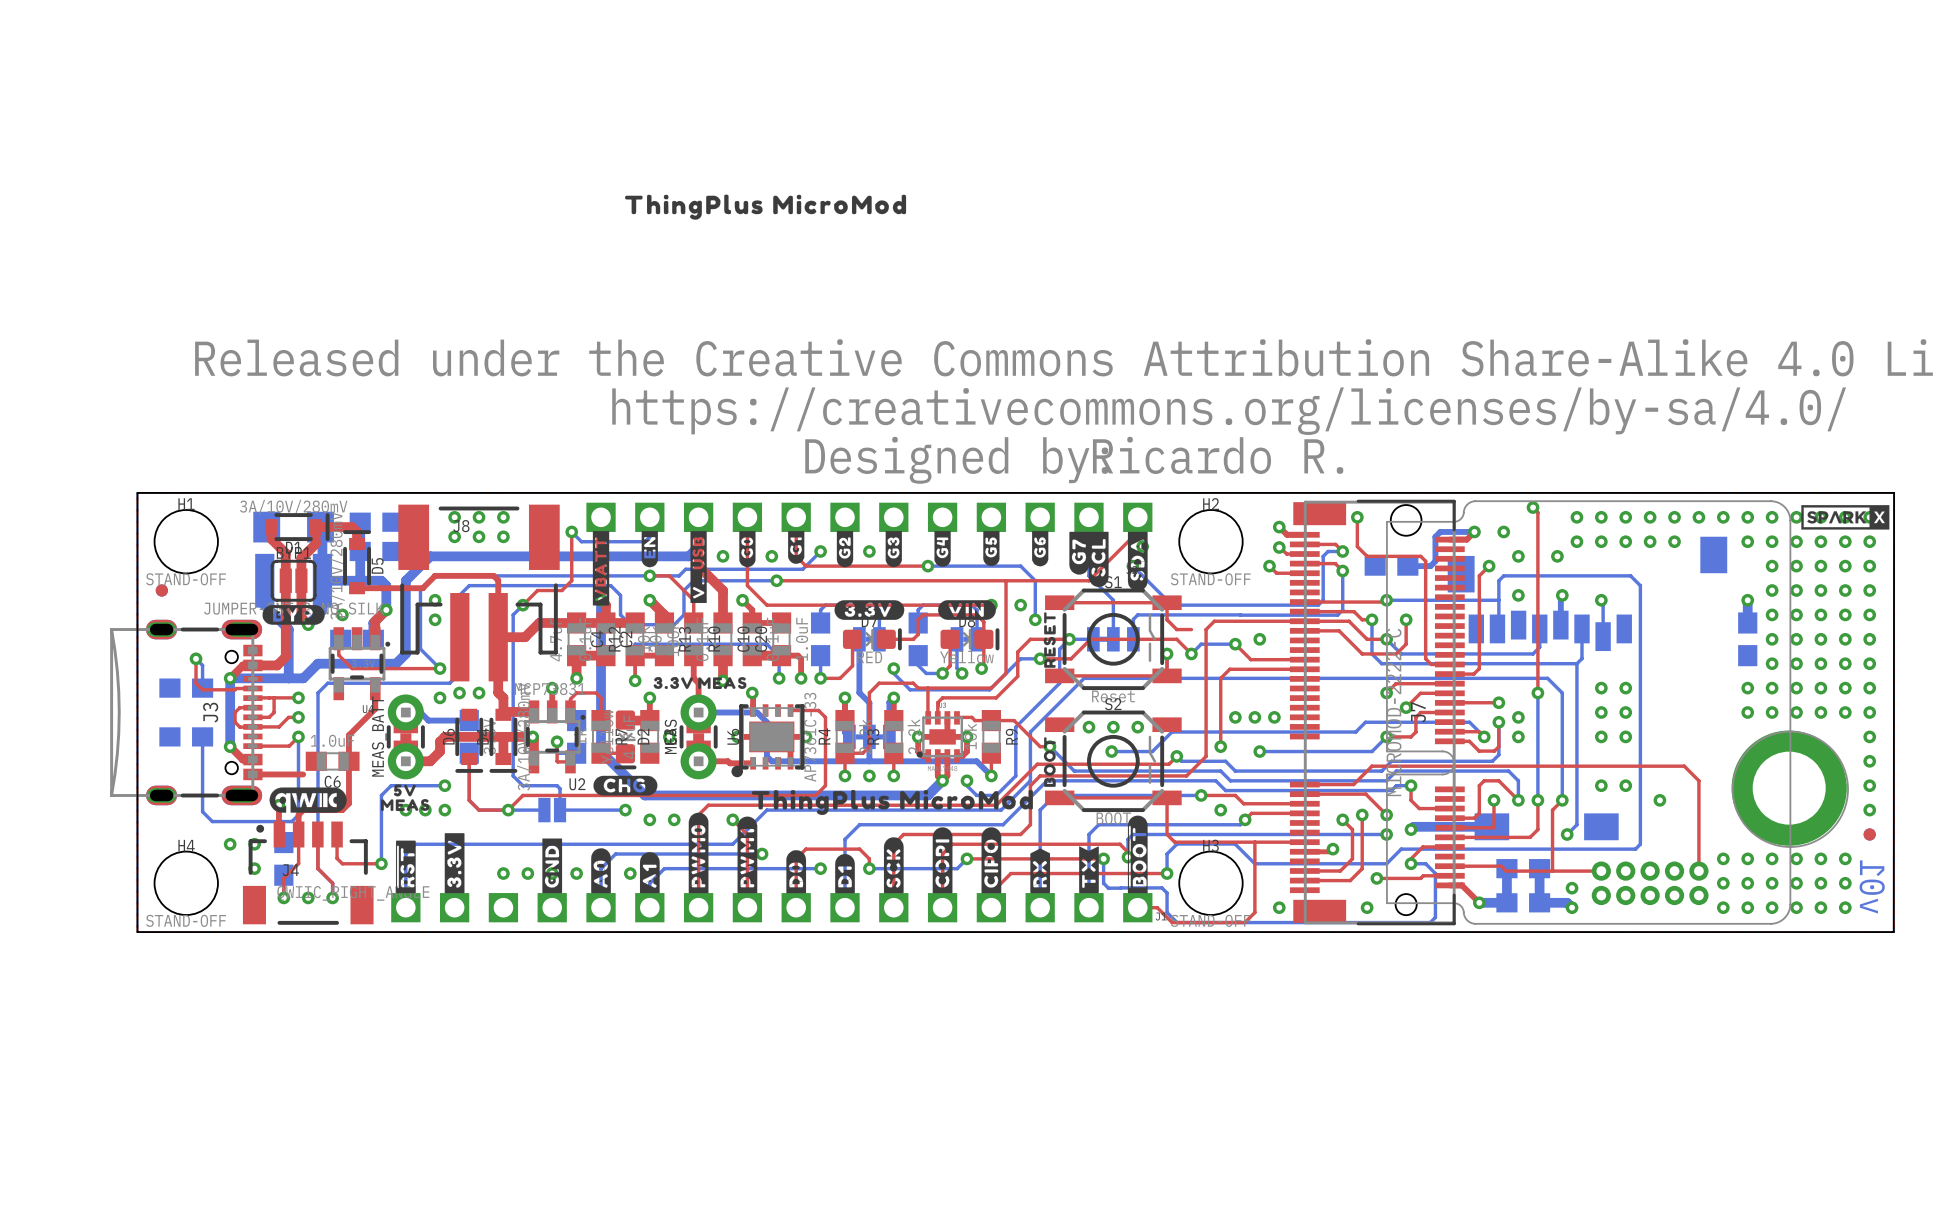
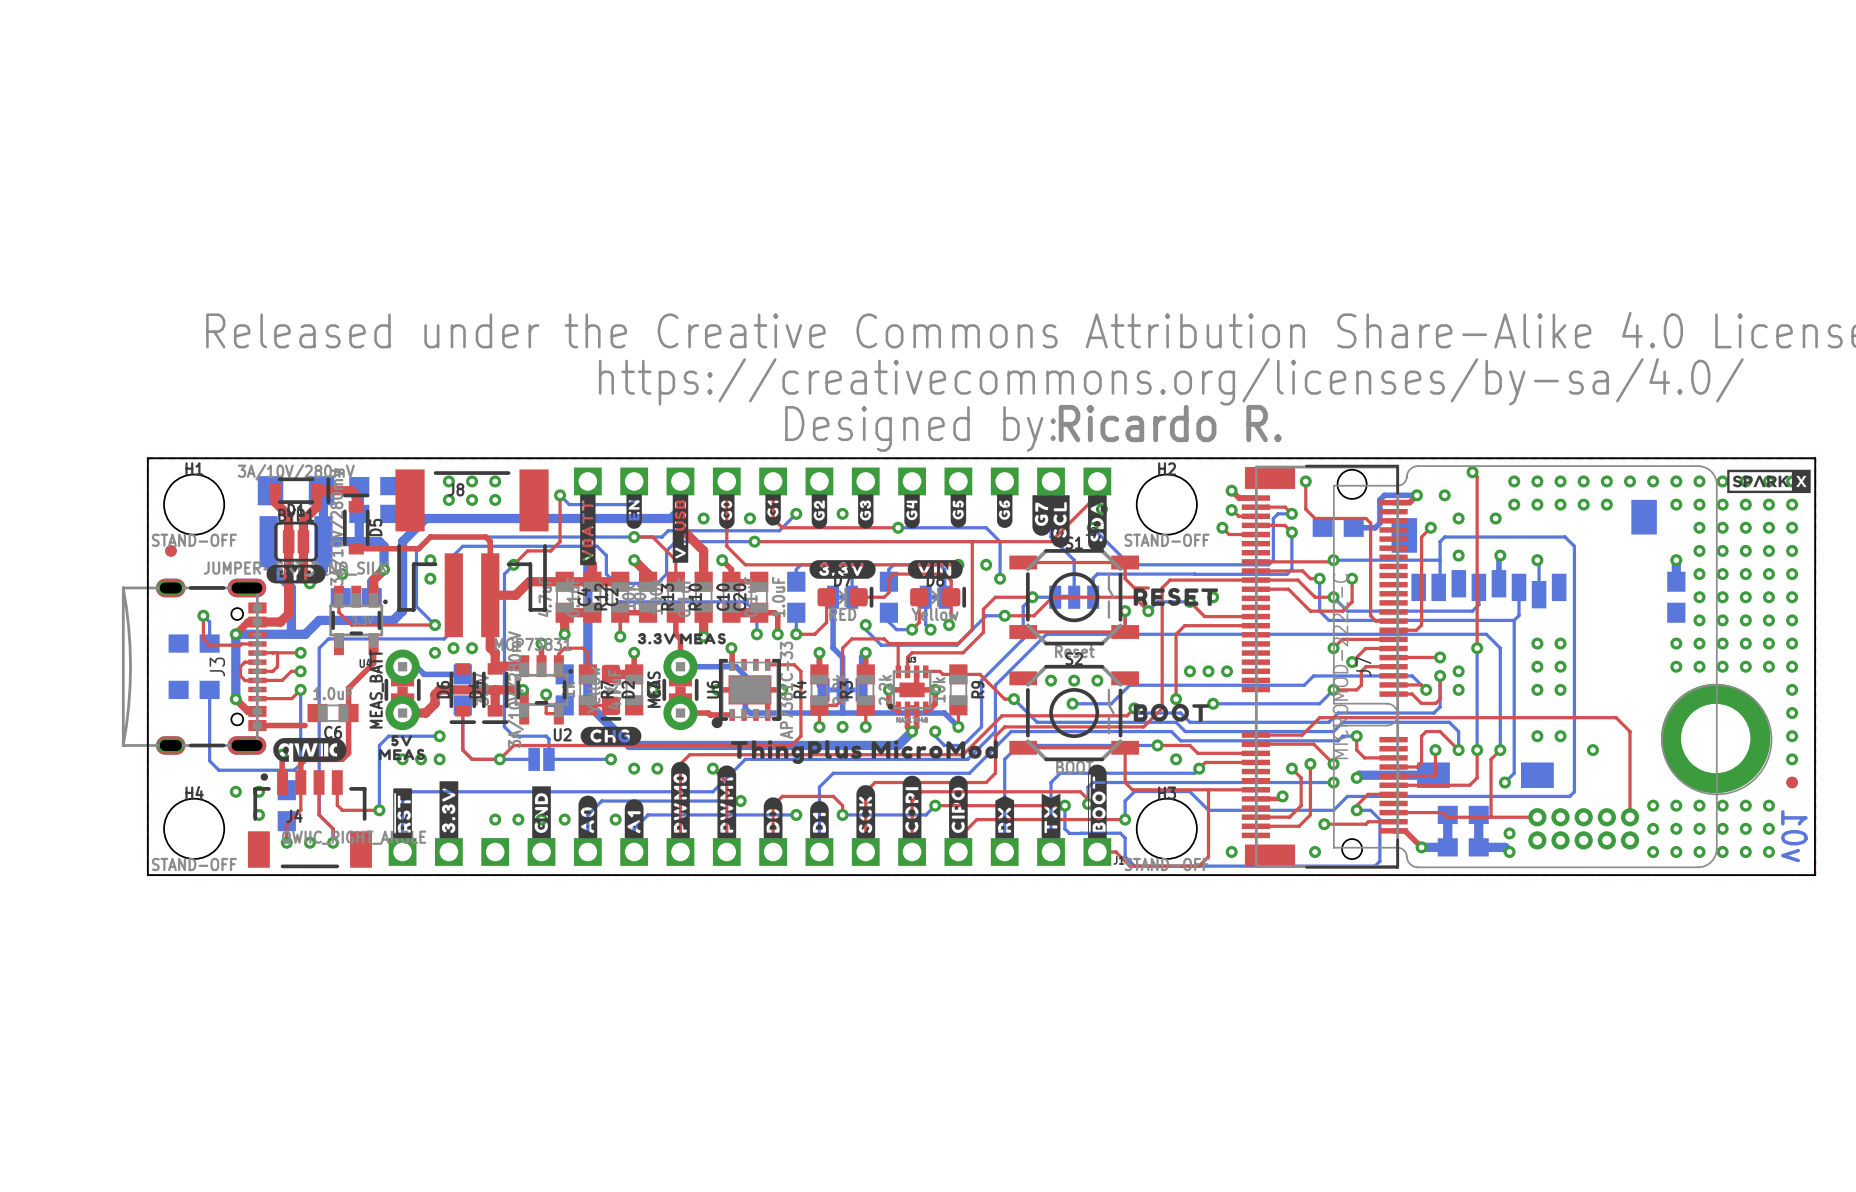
drawing: [625, 194, 907, 220] -> none
drawing: [1043, 612, 1056, 668] -> none
drawing: none -> [1133, 587, 1218, 606]
drawing: [1043, 737, 1056, 787] -> none
drawing: none -> [1133, 703, 1209, 722]

